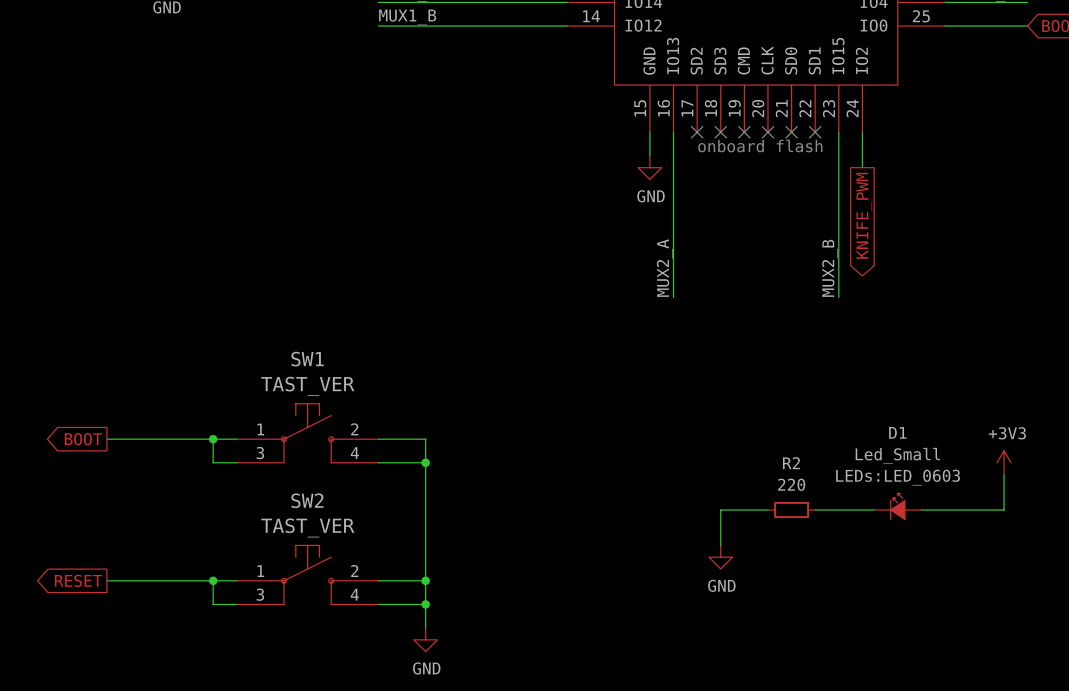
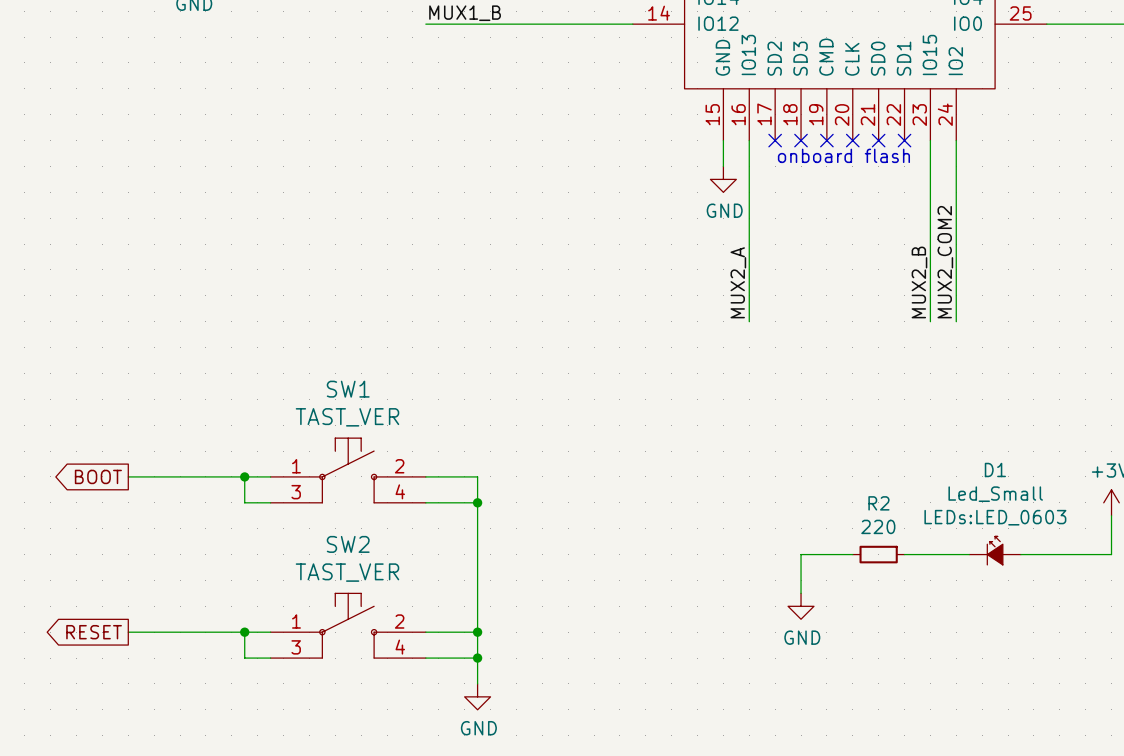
wire: none -> (956, 179) (956, 321)
global label: KNIFE_PWM (864, 215) -> none
label: none -> MUX2_COM2 (945, 262)

